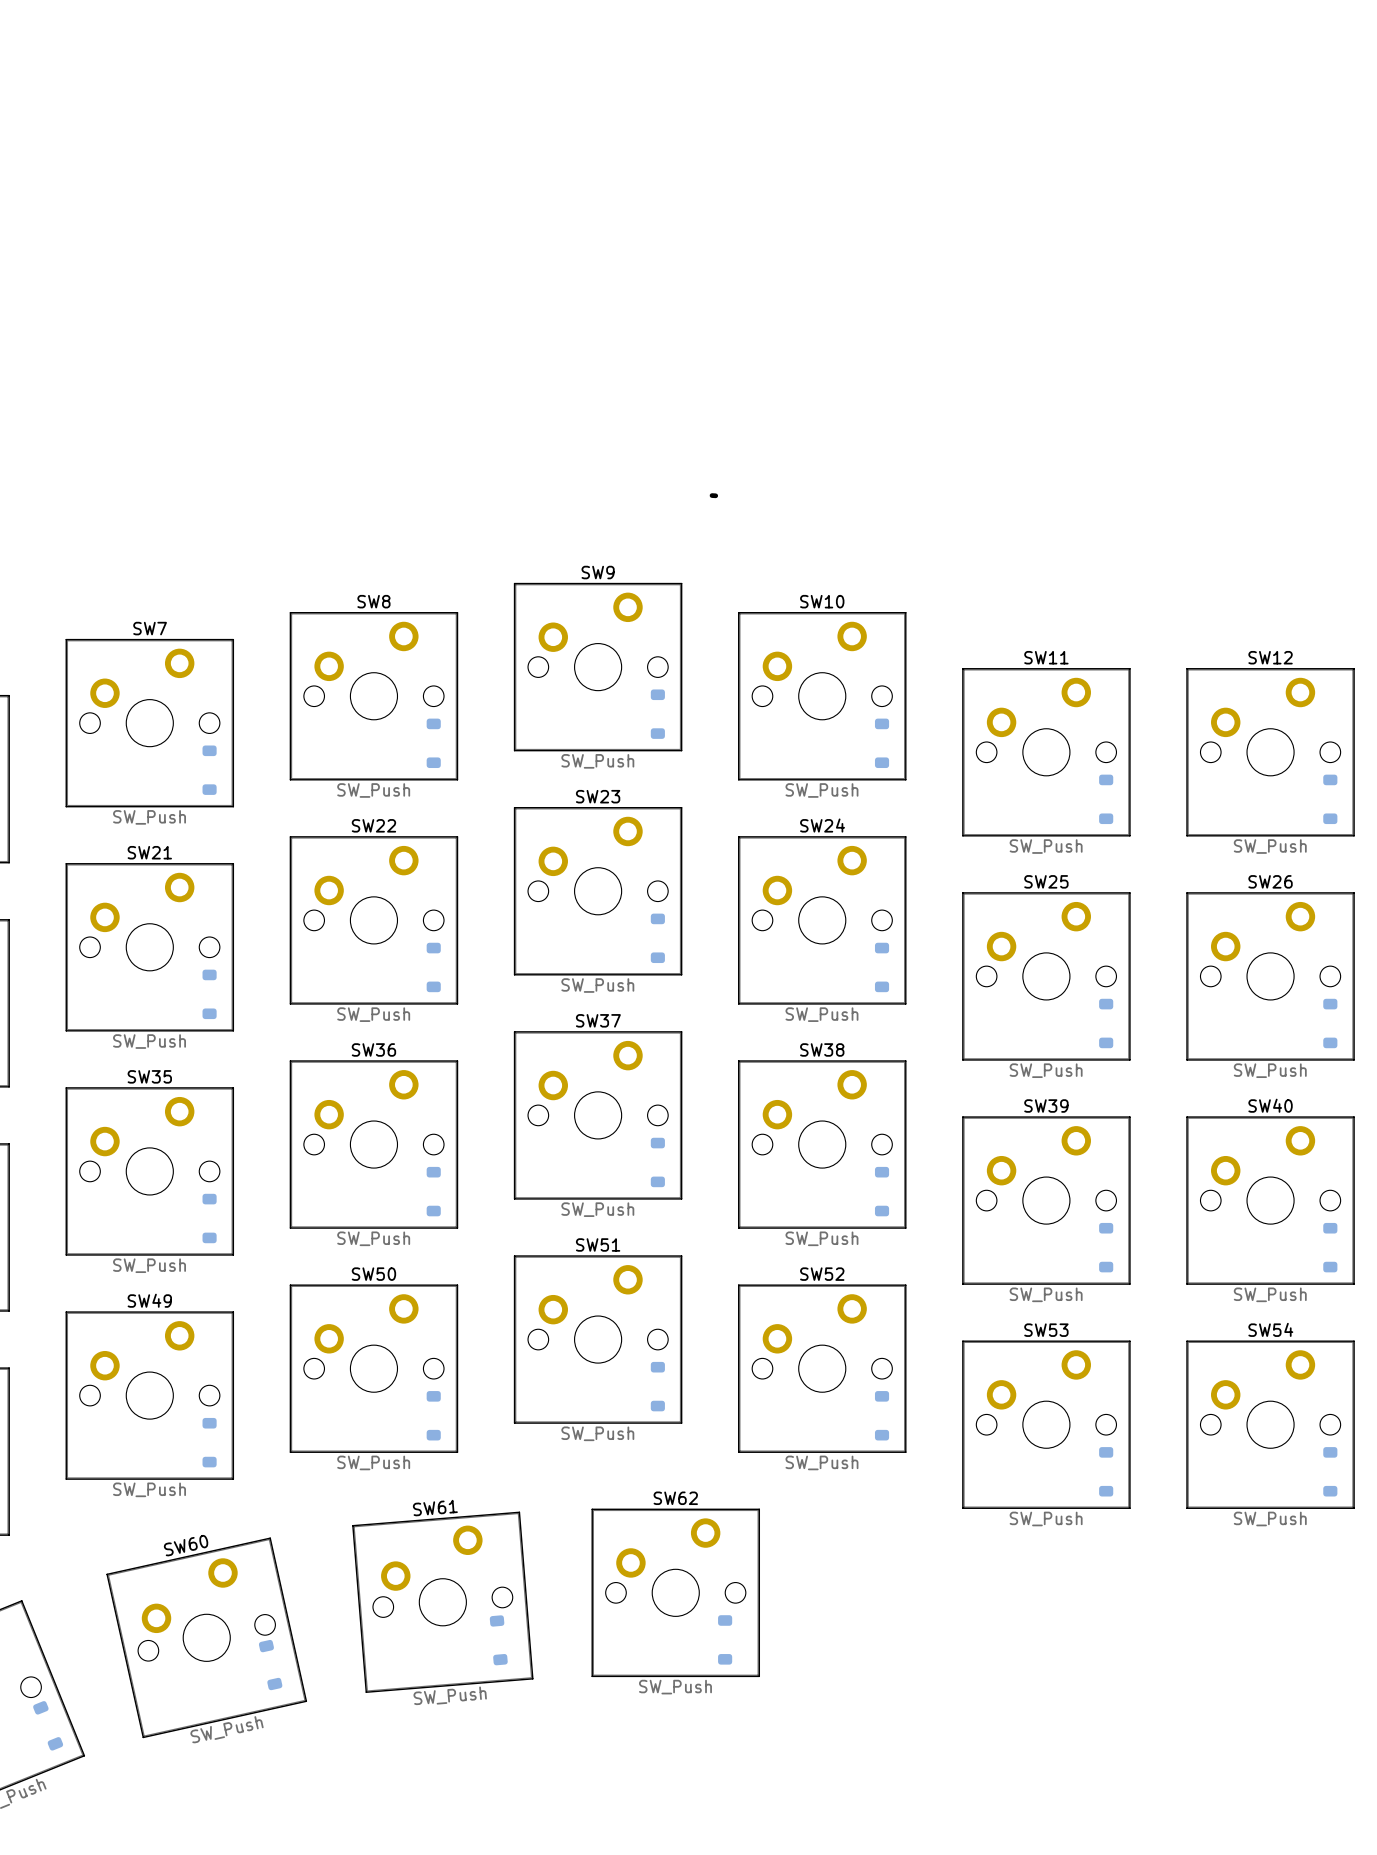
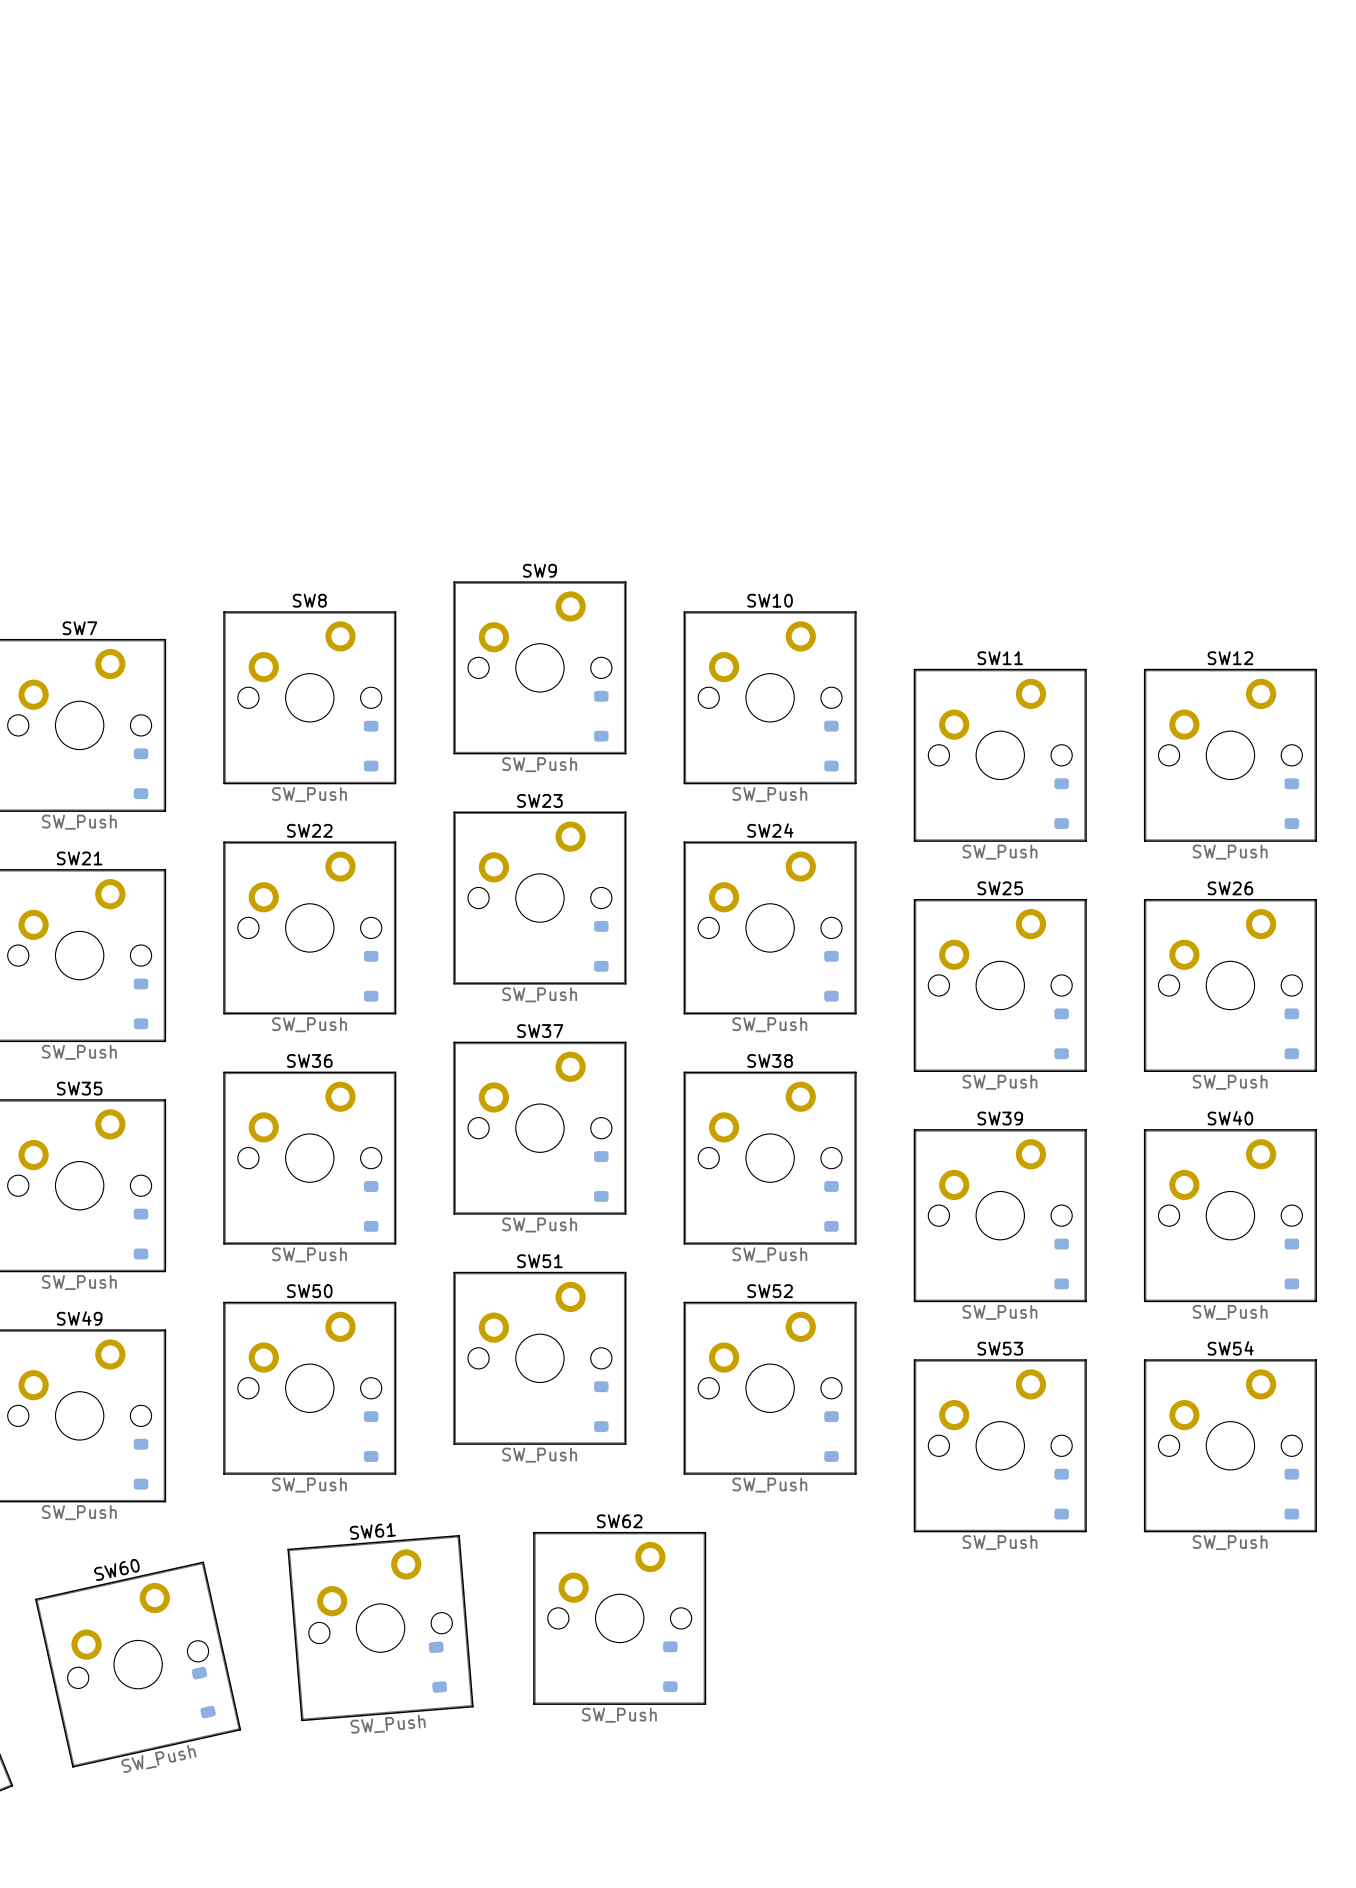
board edge: (712, 495) (715, 495) -> none

